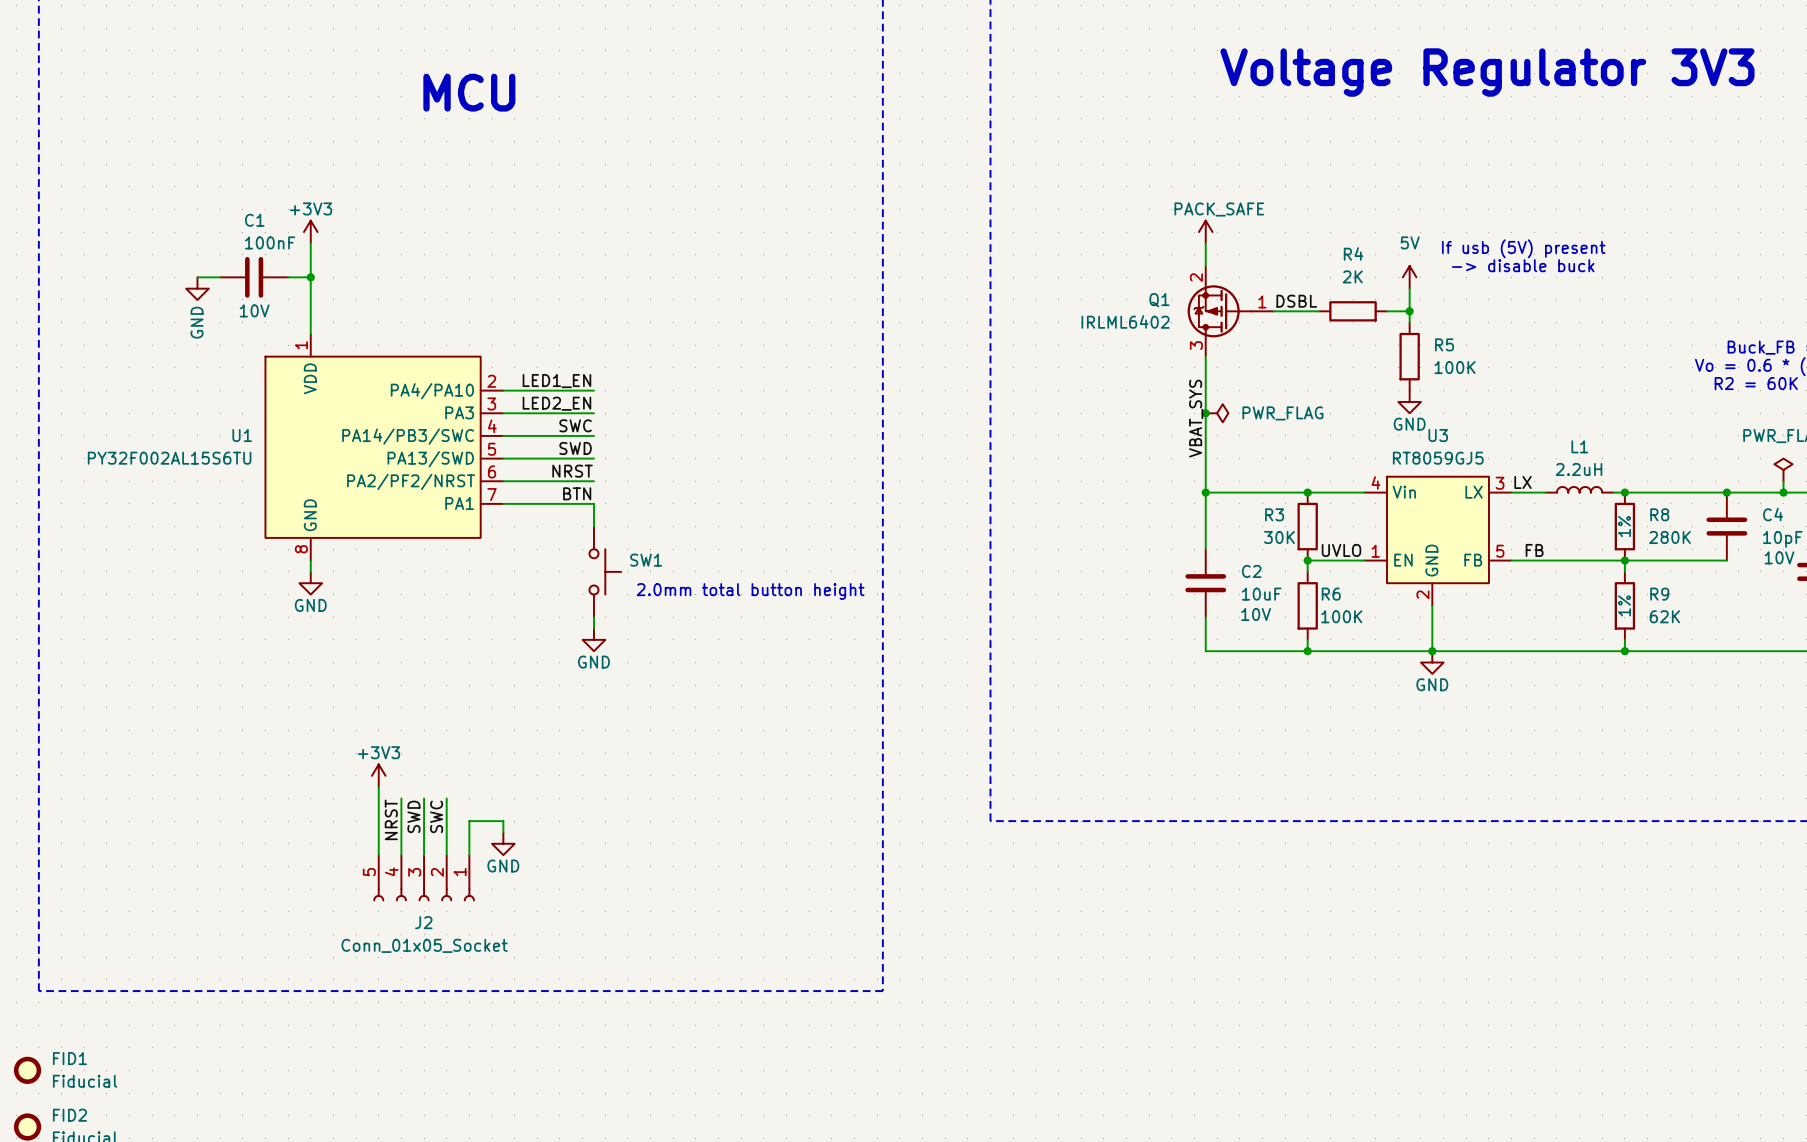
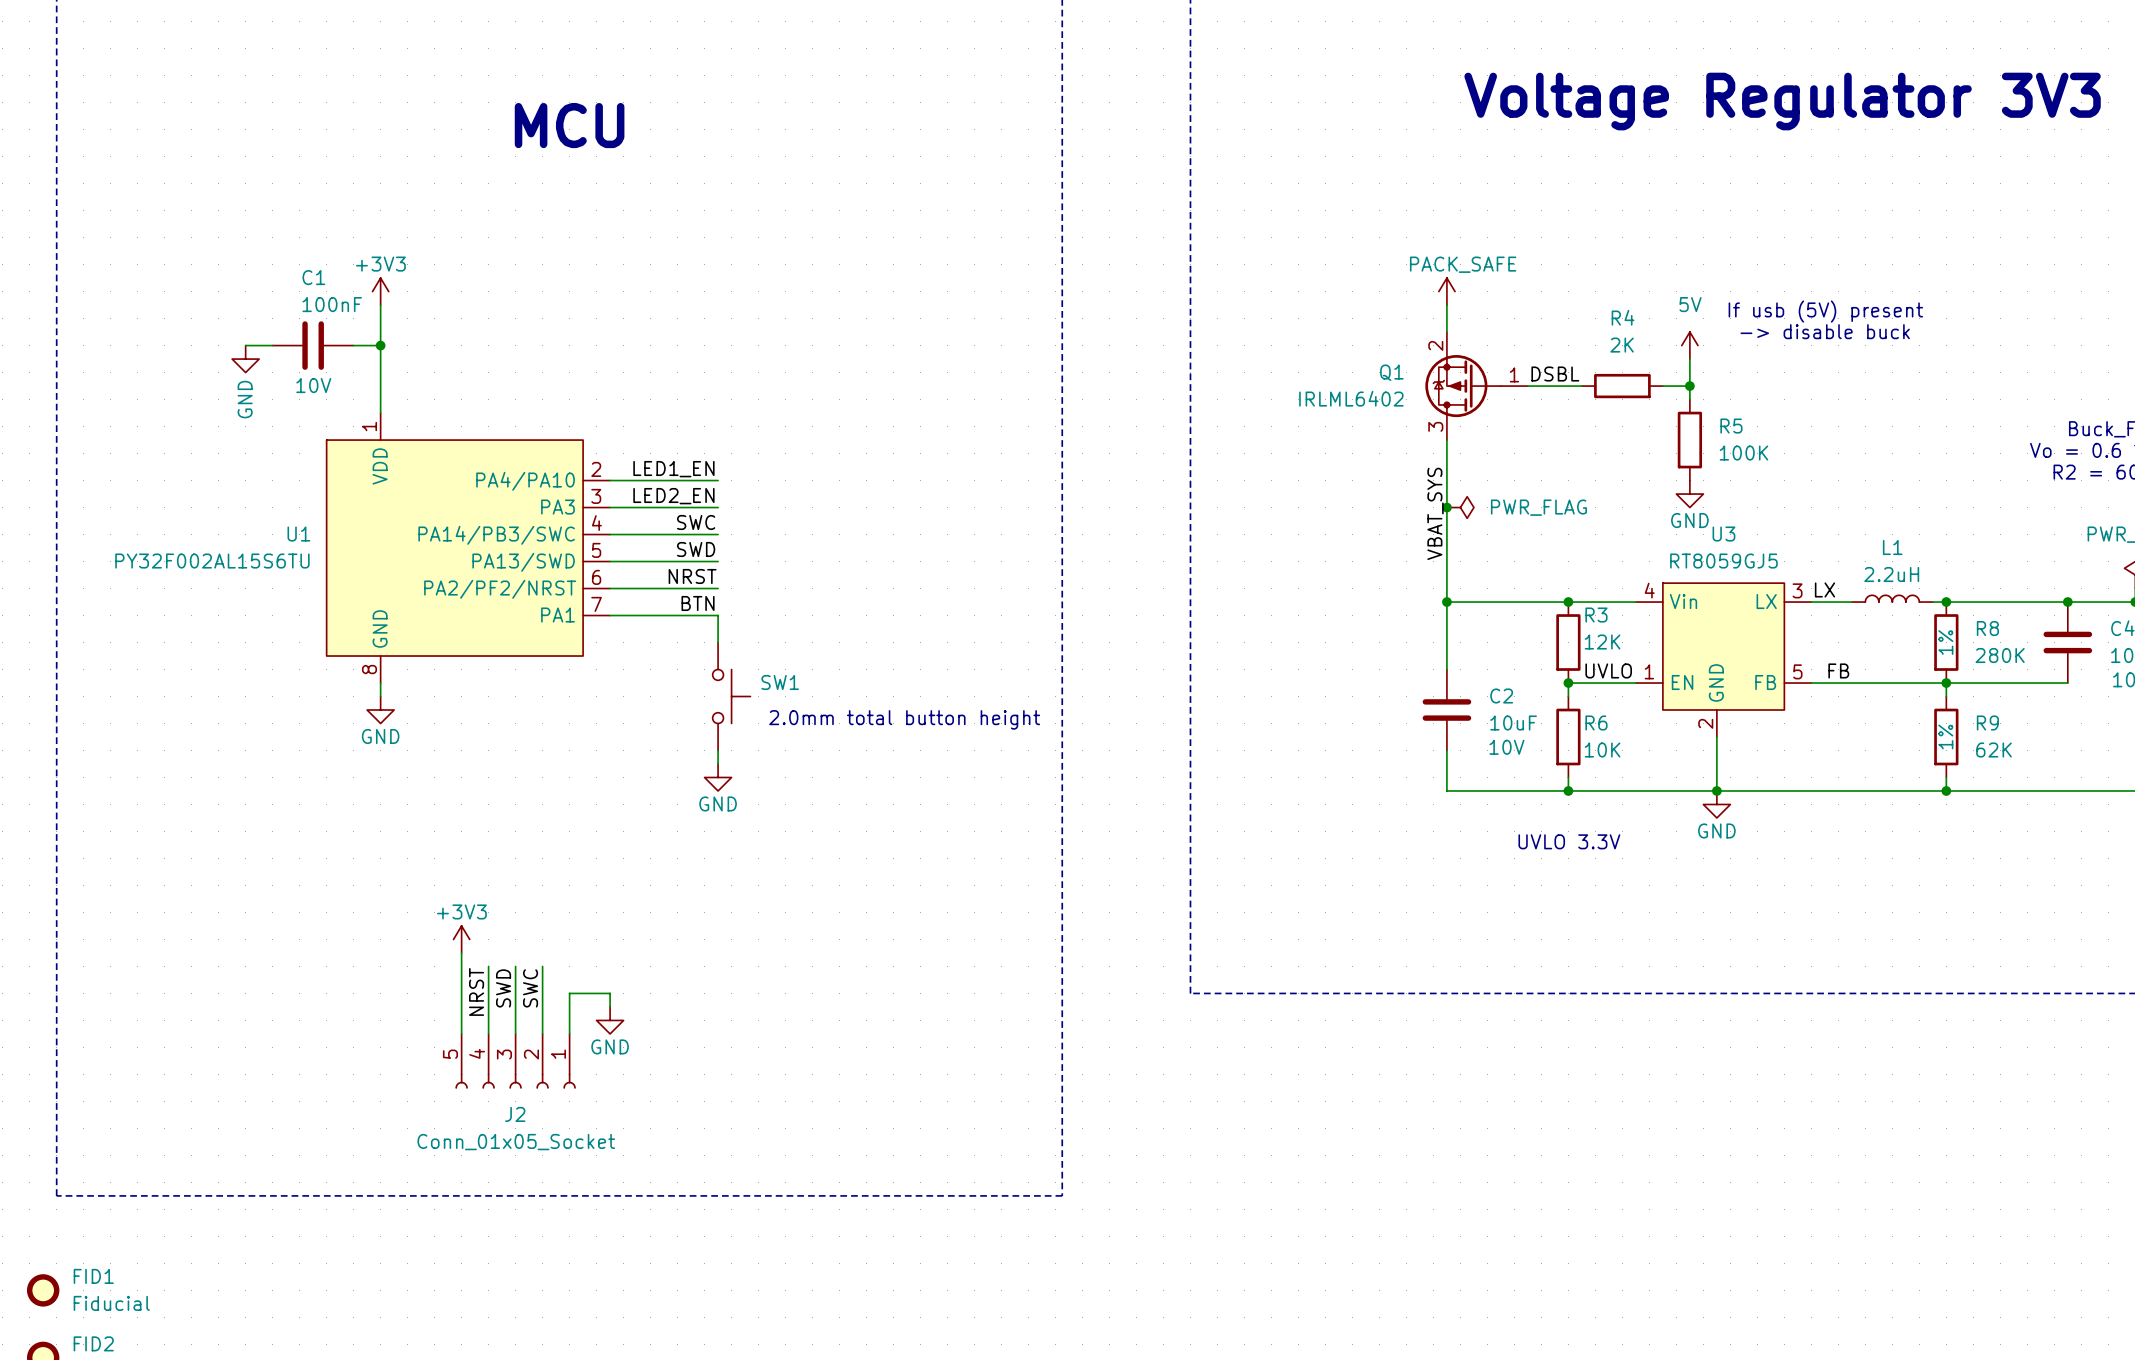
R3 name position: R3 (1274, 514) -> R3 (1596, 615)
R3 value: 30K (1279, 537) -> 12K (1602, 642)
R6 value: 100K (1341, 616) -> 10K (1602, 749)
text: none -> UVLO 3.3V (1569, 841)

